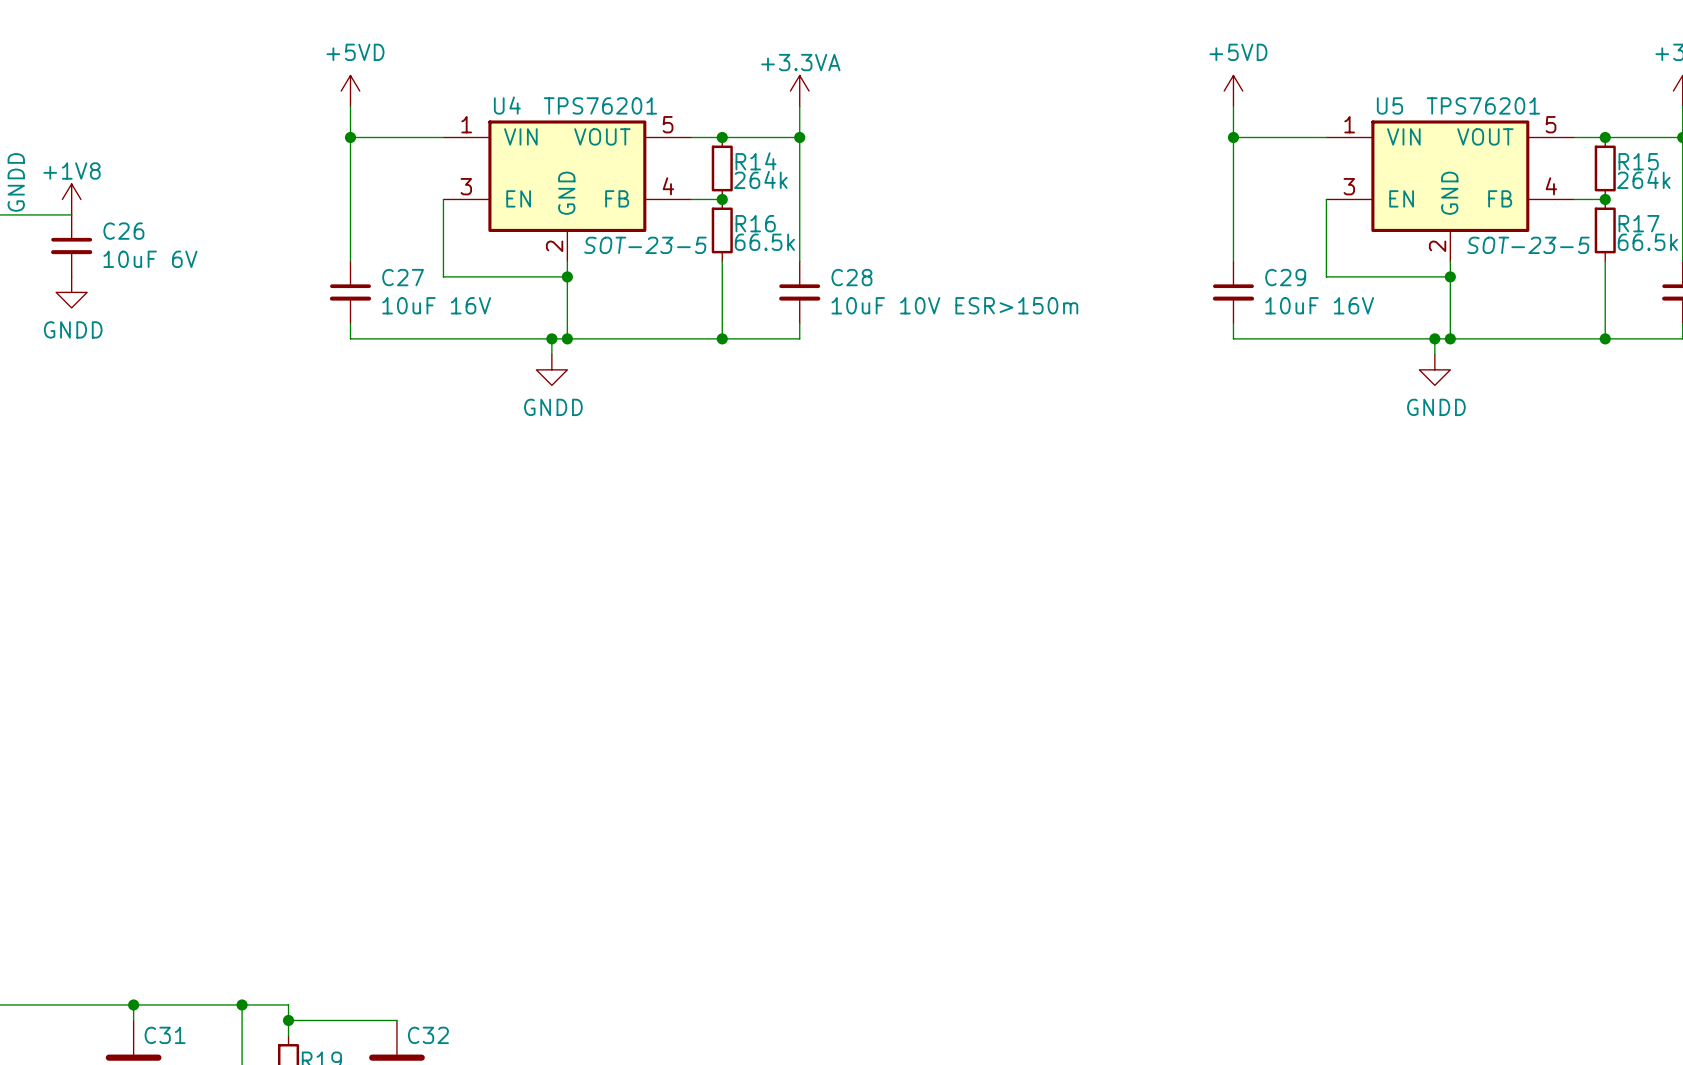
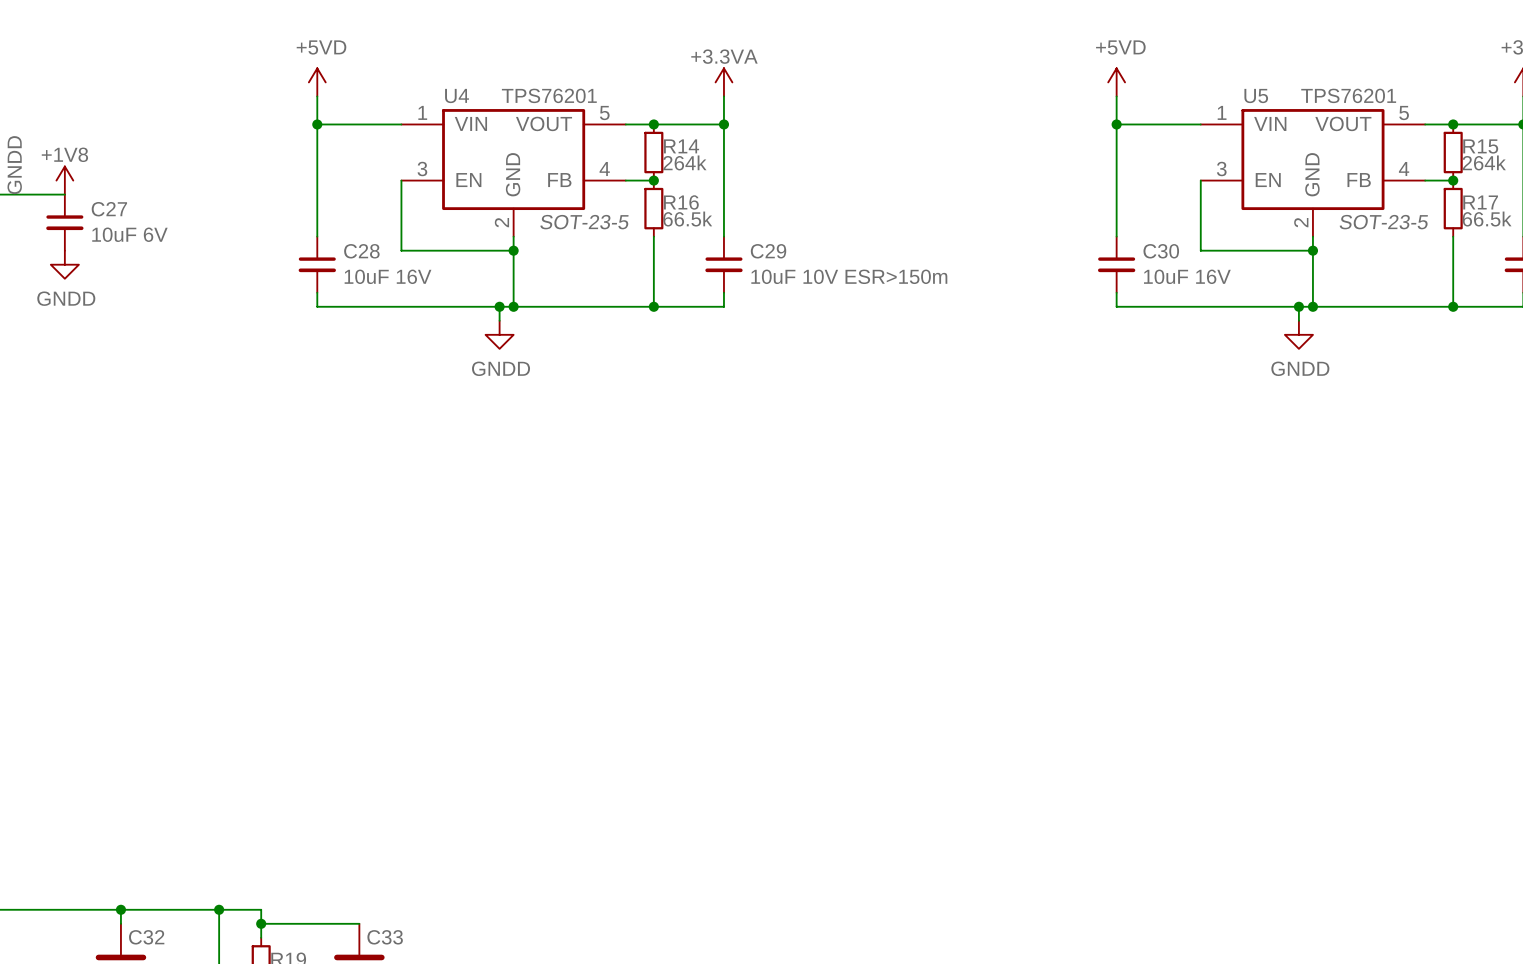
C26 name: C26 (123, 231) -> C27 (109, 209)
C27 name: C27 (403, 277) -> C28 (361, 251)
C28 name: C28 (851, 277) -> C29 (768, 251)
C29 name: C29 (1285, 277) -> C30 (1161, 251)
C31 name: C31 (165, 1035) -> C32 (146, 937)
C32 name: C32 (428, 1035) -> C33 (385, 937)

